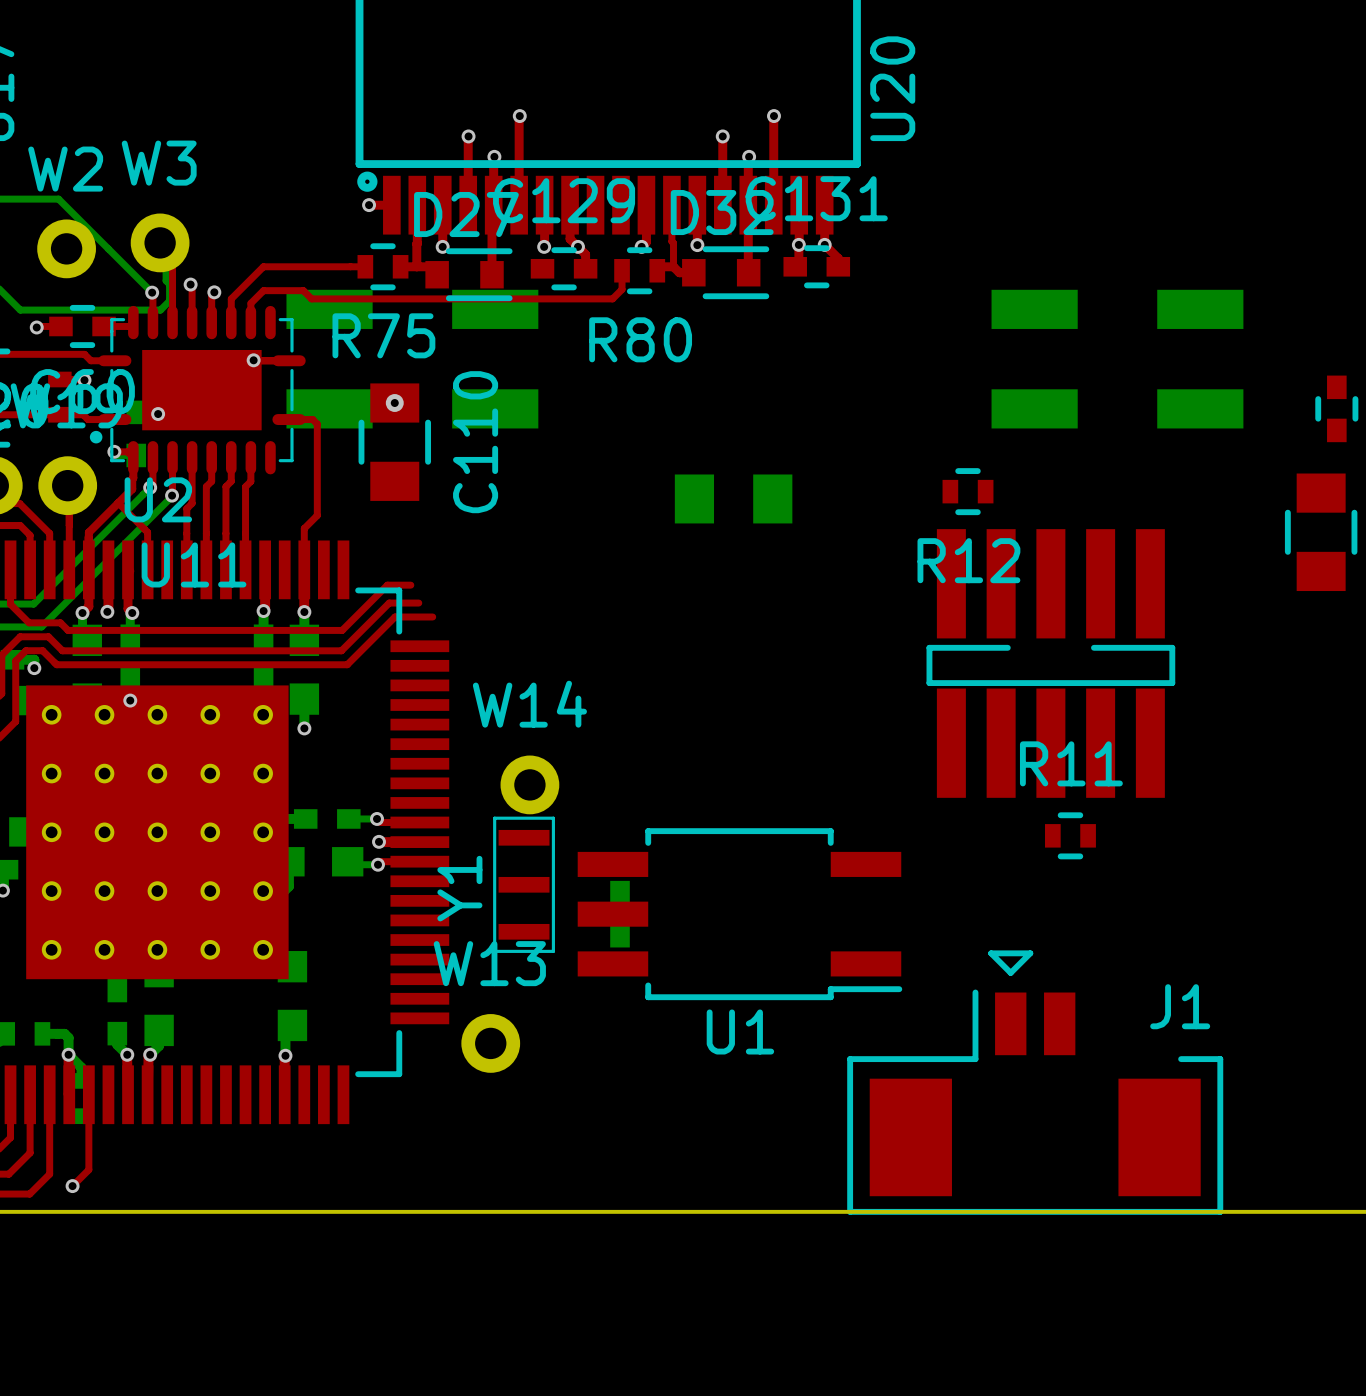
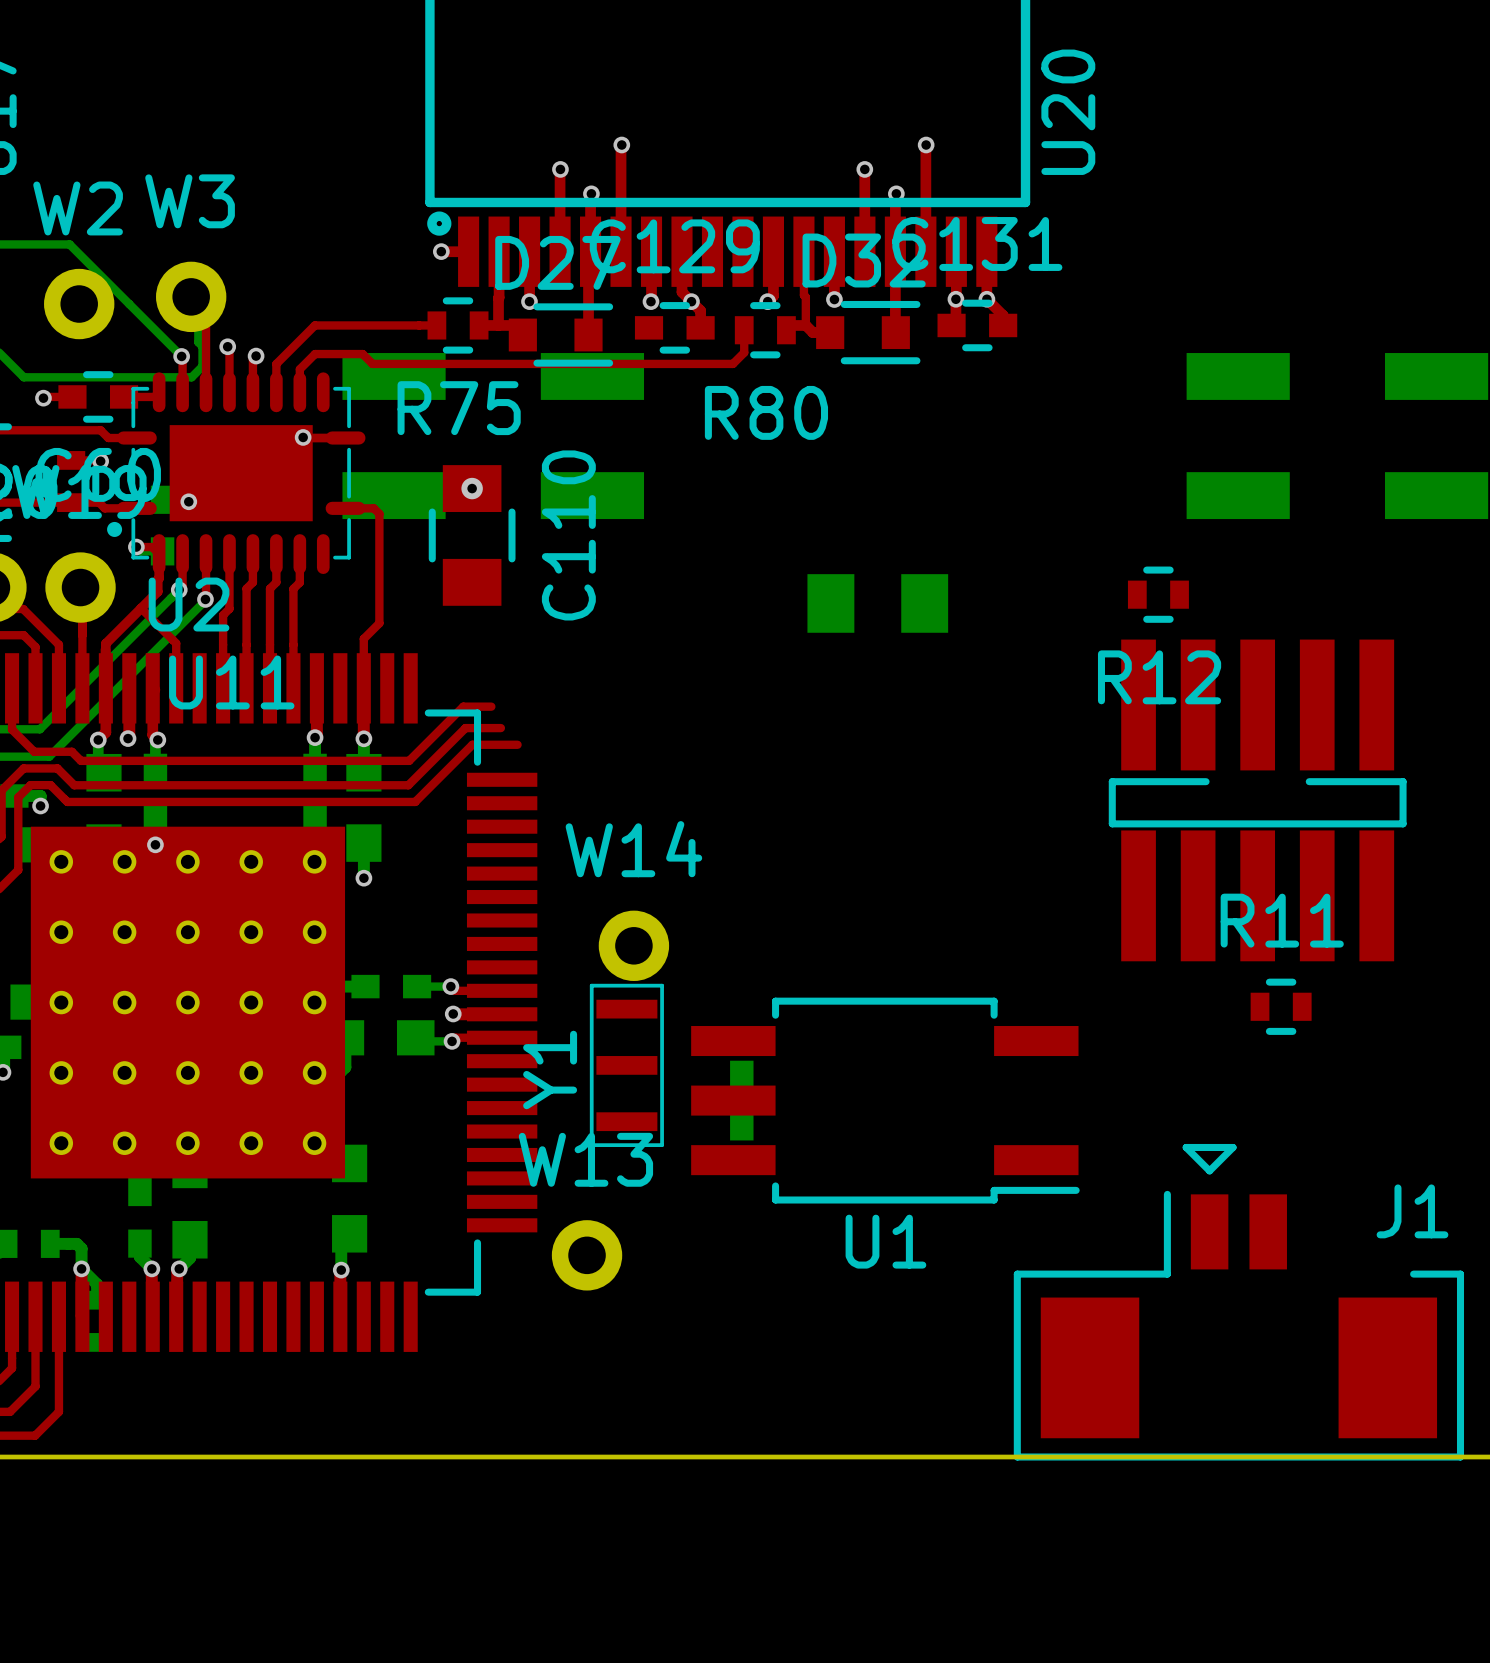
top track: (88, 1094) (88, 1169) (72, 1186) -> none
via: (72, 1186) -> none

